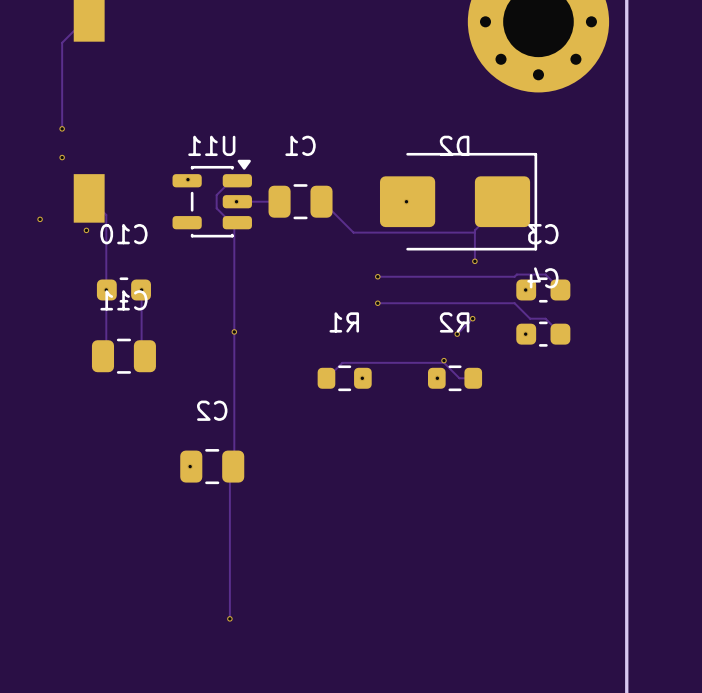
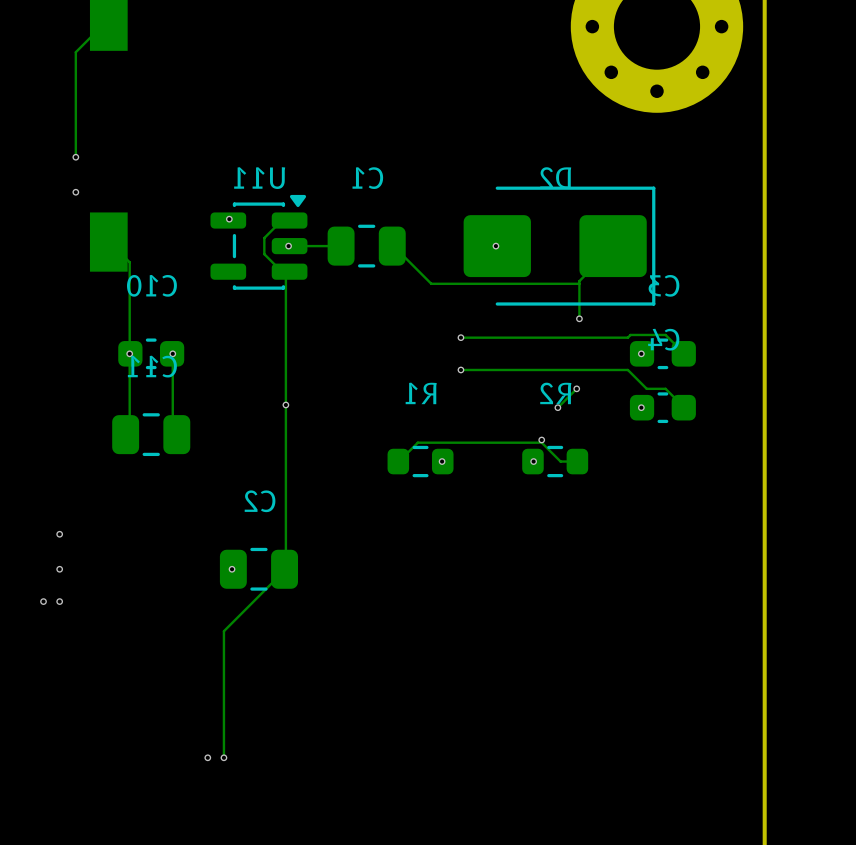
via: (40, 219) -> none
via: (86, 230) -> none
via: none -> (59, 534)
via: none -> (59, 569)
track: none -> (285, 569) (223, 631) (223, 757)
track: (229, 470) (229, 618) -> none
via: none -> (43, 601)
via: none -> (59, 601)
via: (229, 618) -> none
via: none -> (207, 757)
via: none -> (223, 757)

